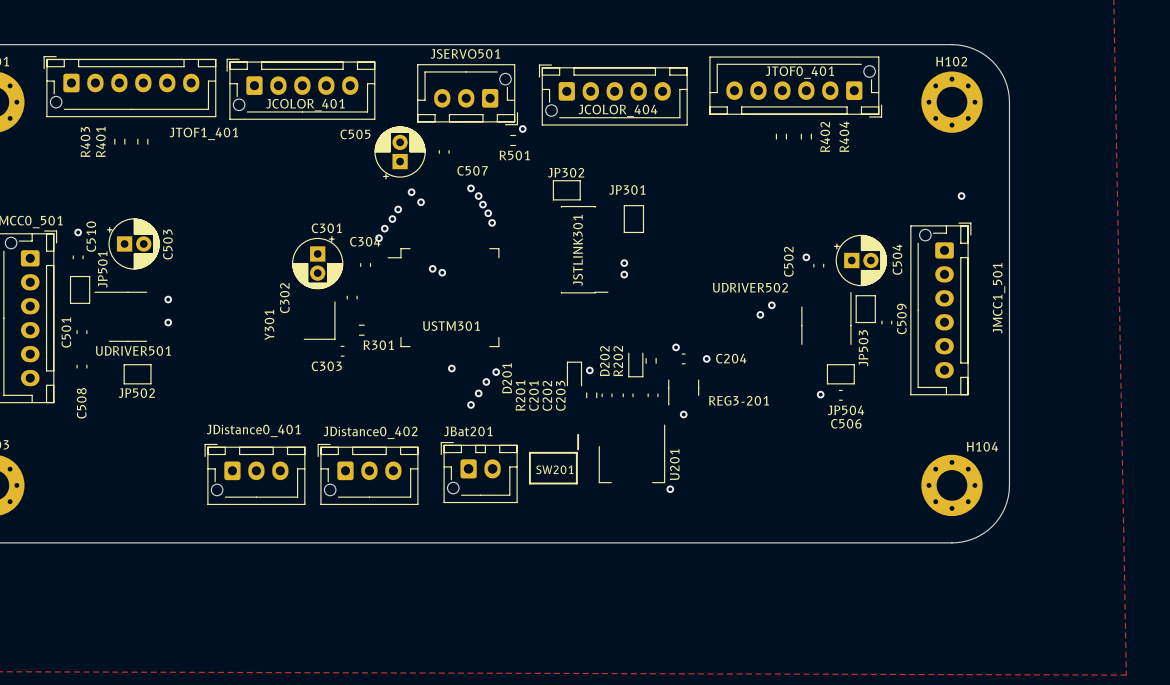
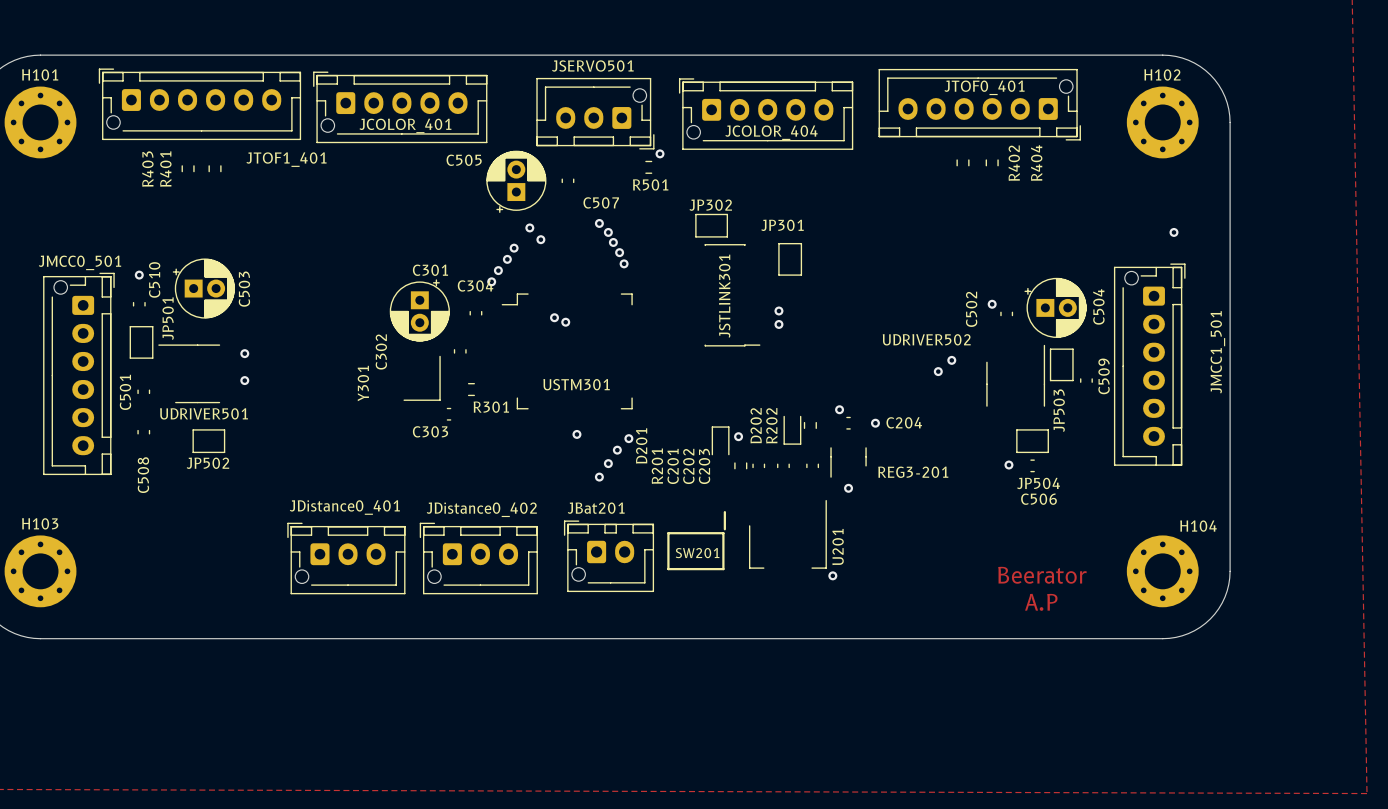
text: none -> Beerator (1042, 575)
text: none -> A.P (1041, 602)

